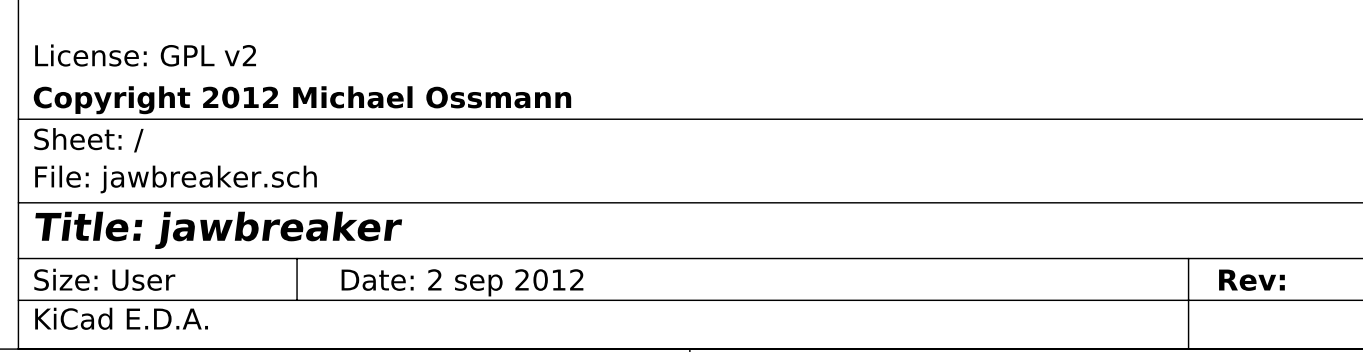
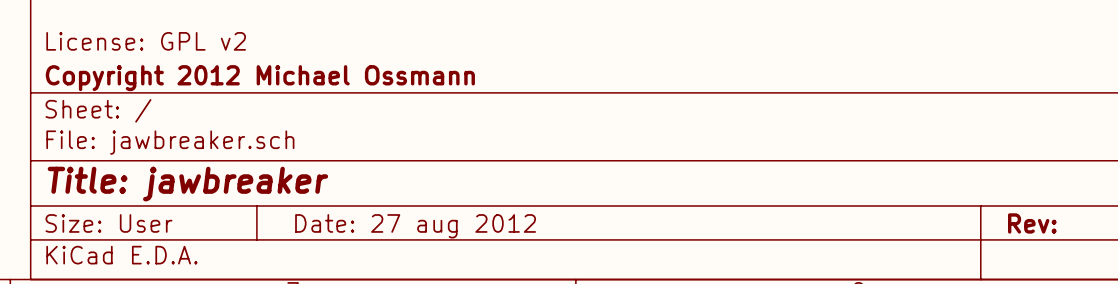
title block: Date: 2 sep 2012 (462, 282) -> Date: 27 aug 2012 (415, 226)

